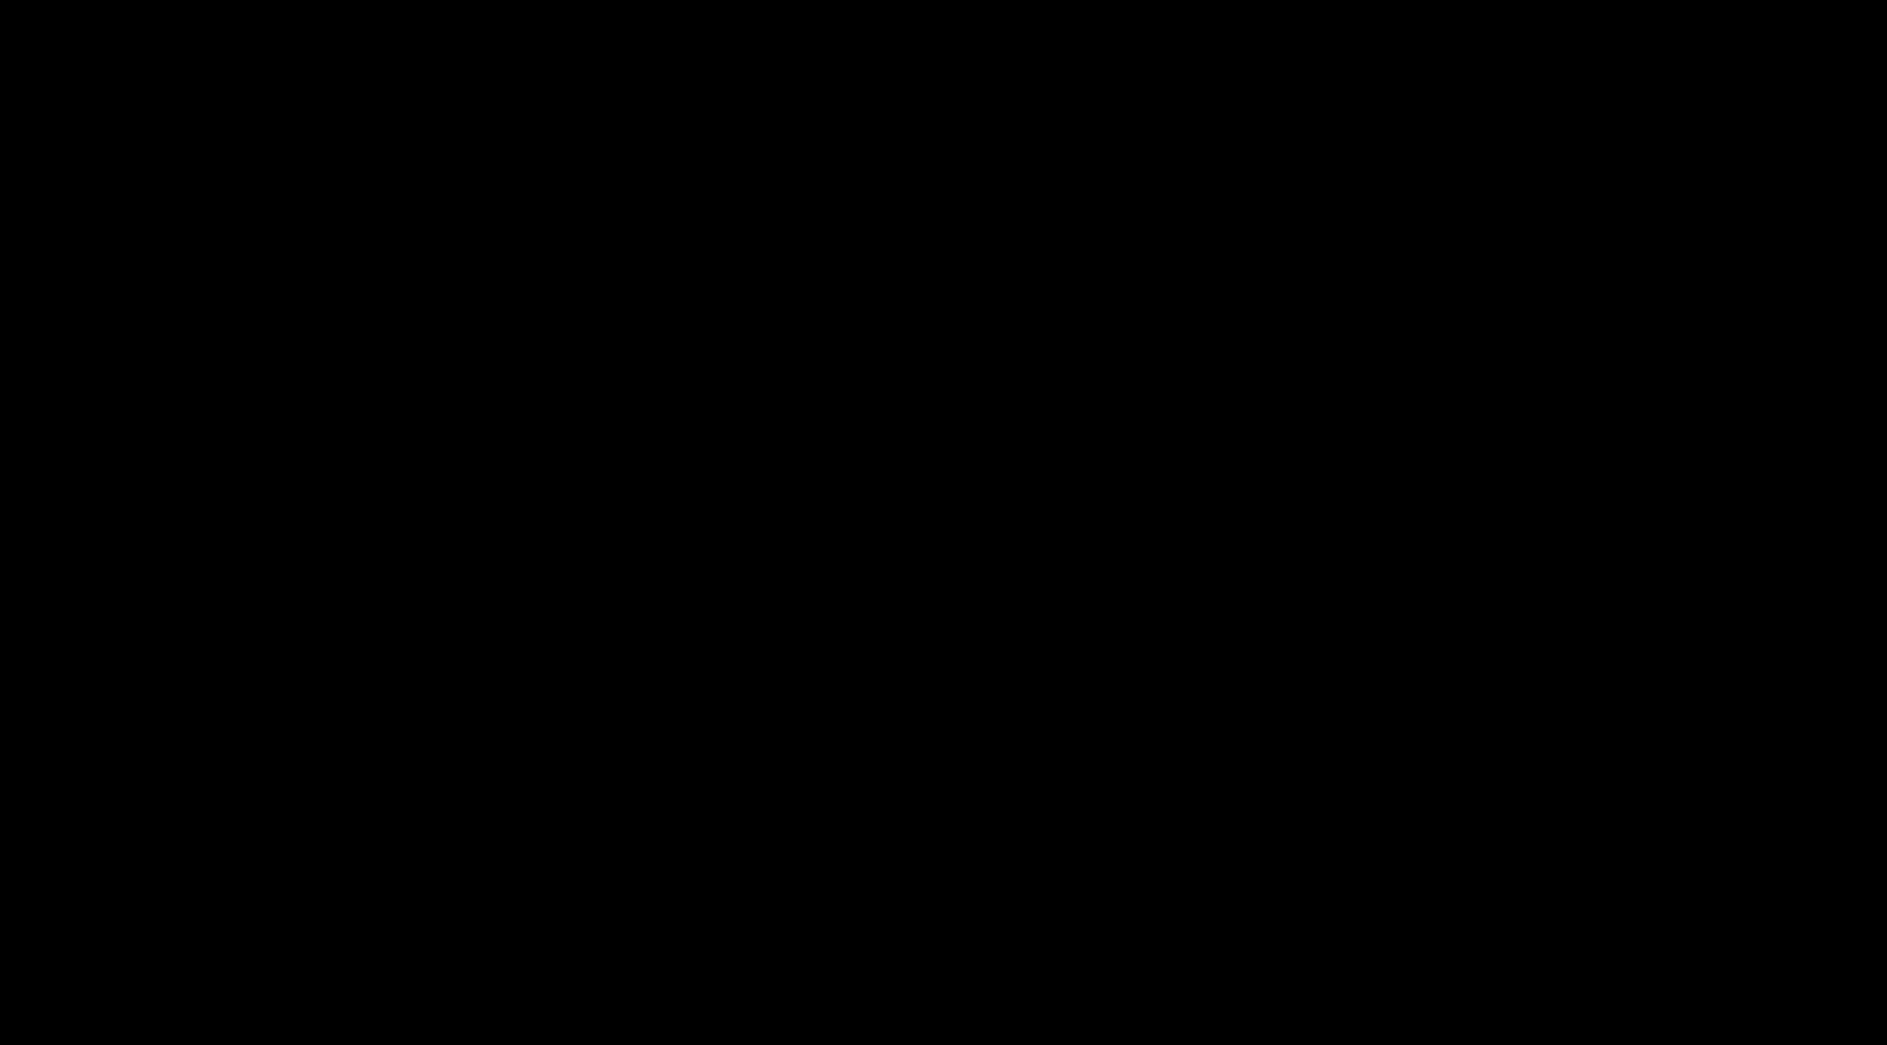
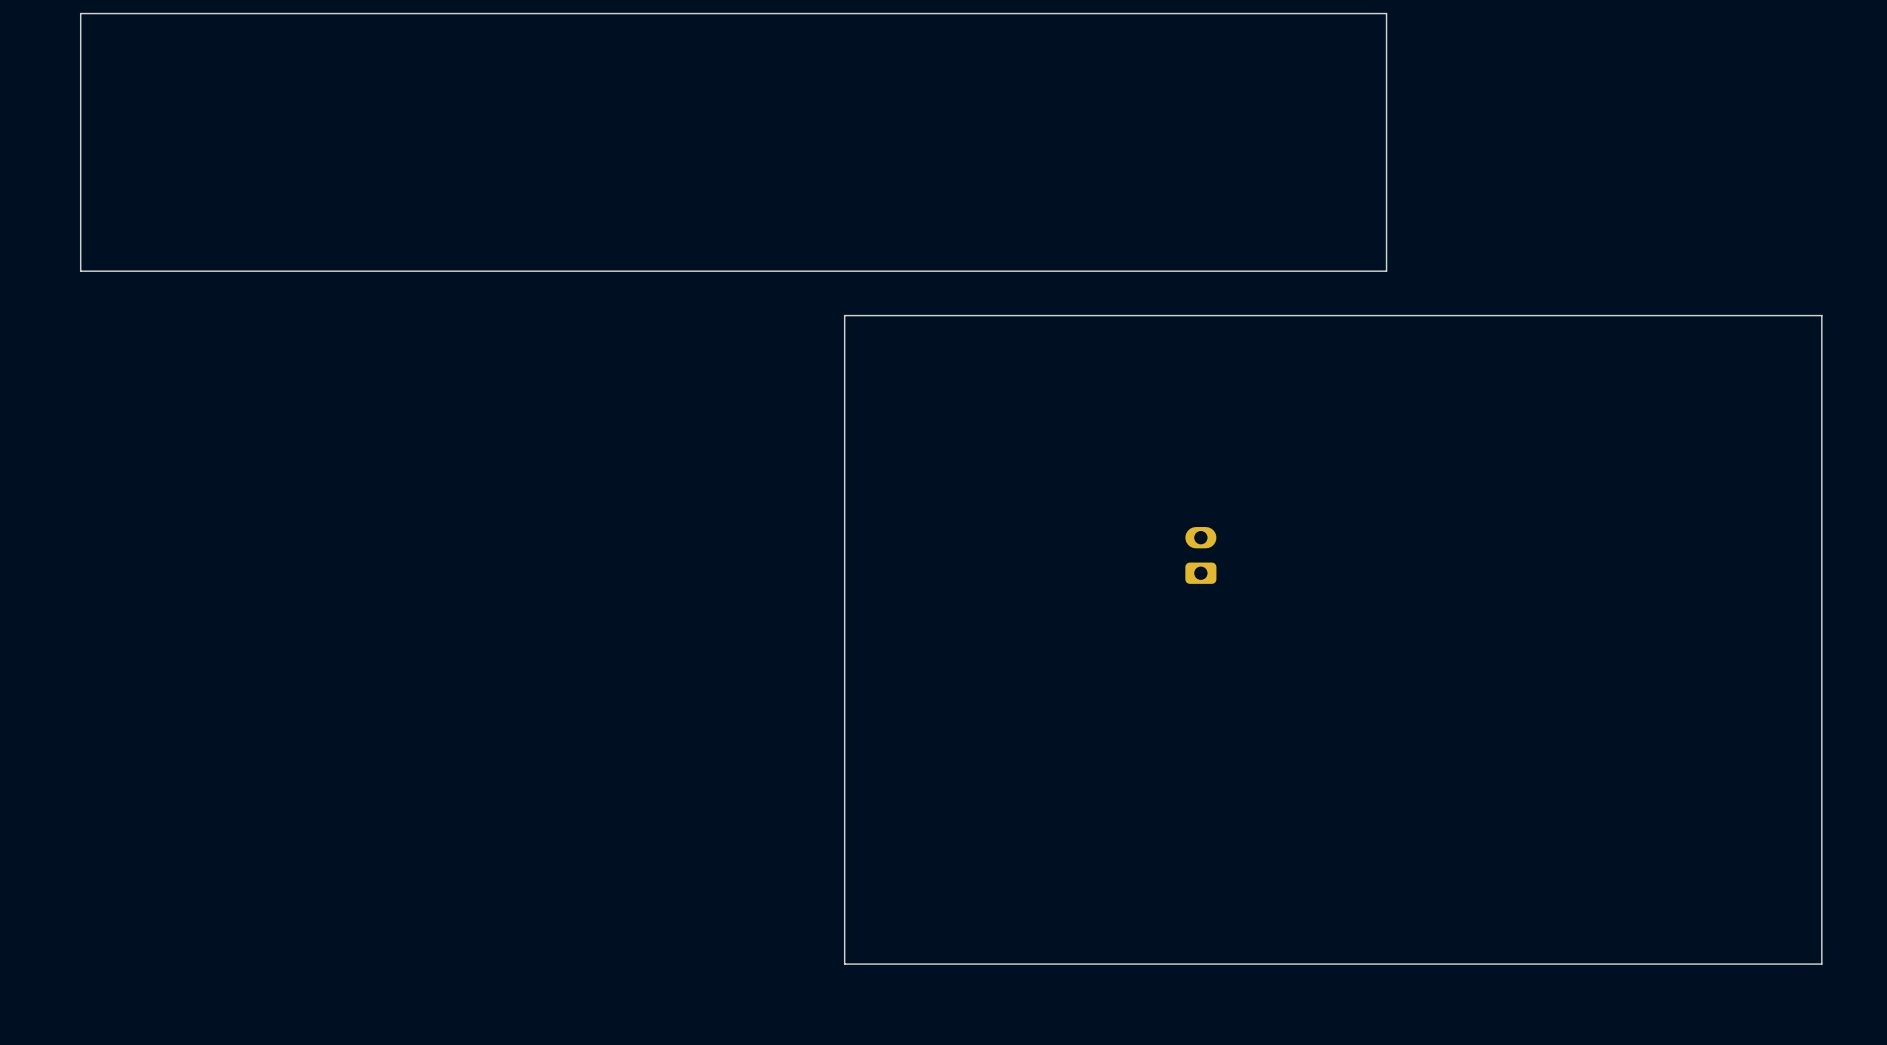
board edge: none -> (1386, 13) (80, 13) (80, 271) (1386, 271) (1386, 13)
board edge: none -> (1821, 315) (844, 315) (844, 964) (1821, 964) (1821, 315)
part: none -> (1200, 555)

